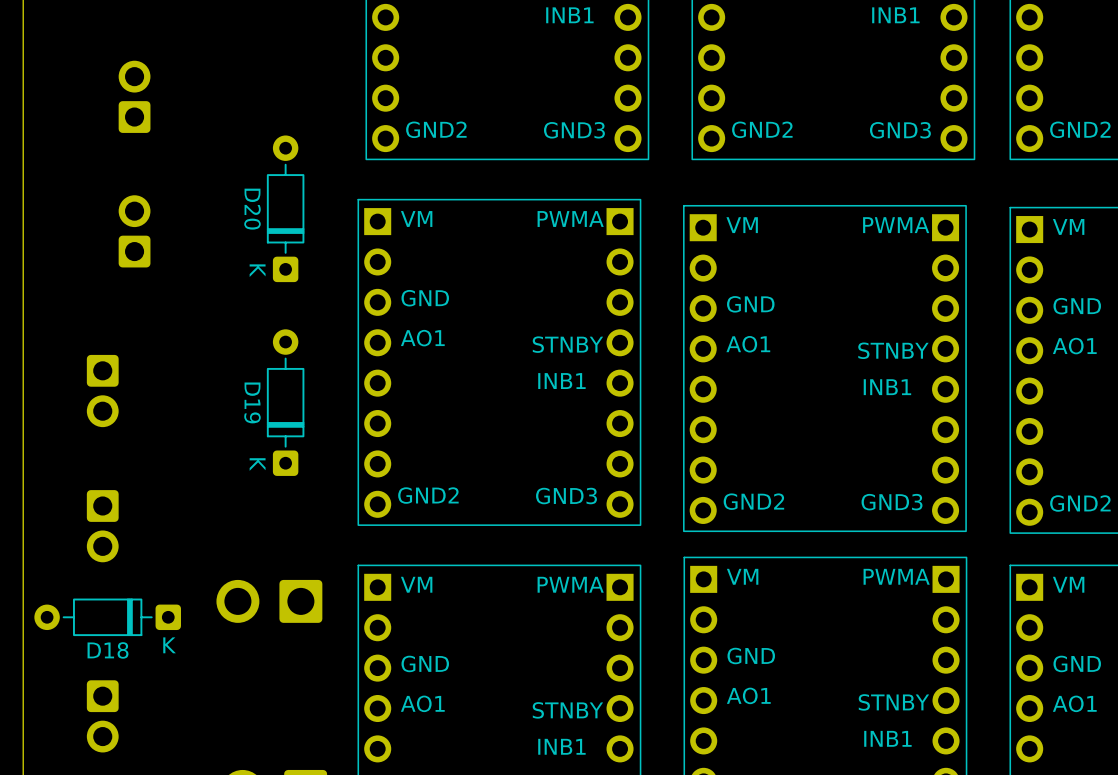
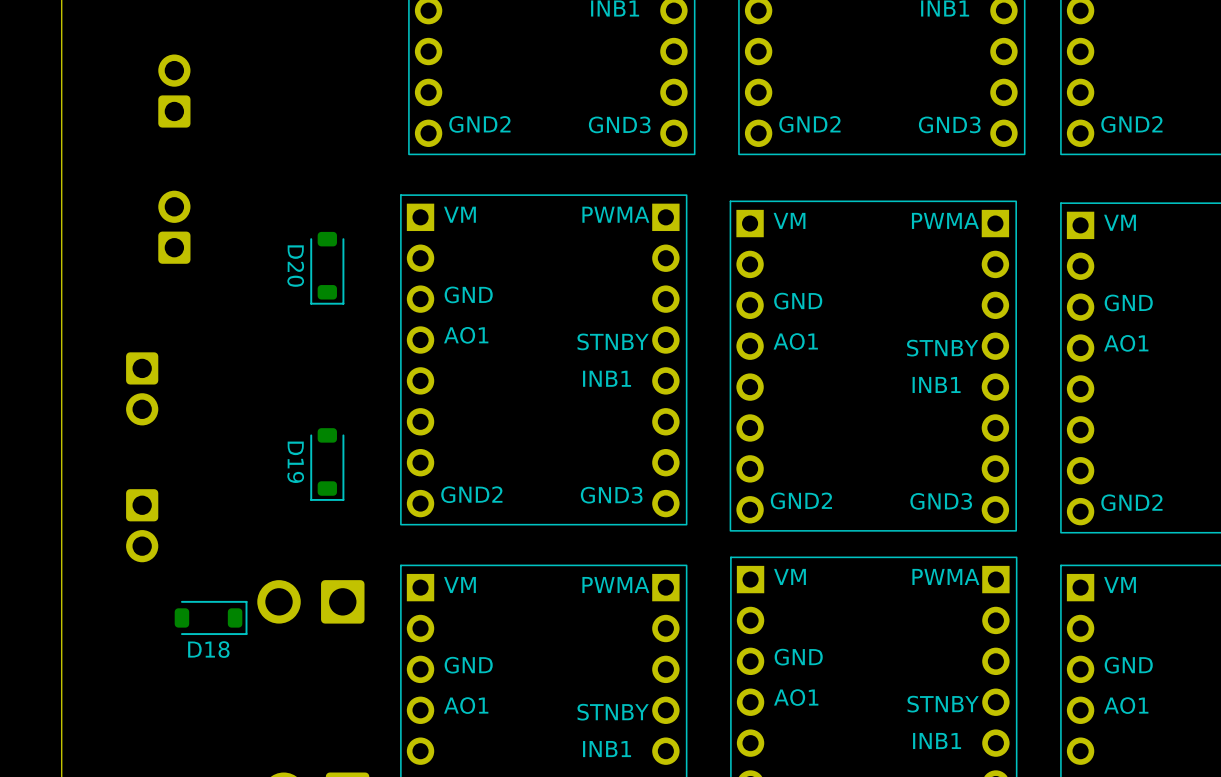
D20 footprint: [266, 135, 305, 283] -> [310, 231, 345, 305]
D19 footprint: [266, 329, 305, 476] -> [310, 428, 345, 501]
D18 footprint: [34, 598, 181, 637] -> [174, 600, 248, 636]
part: (102, 716) -> none

